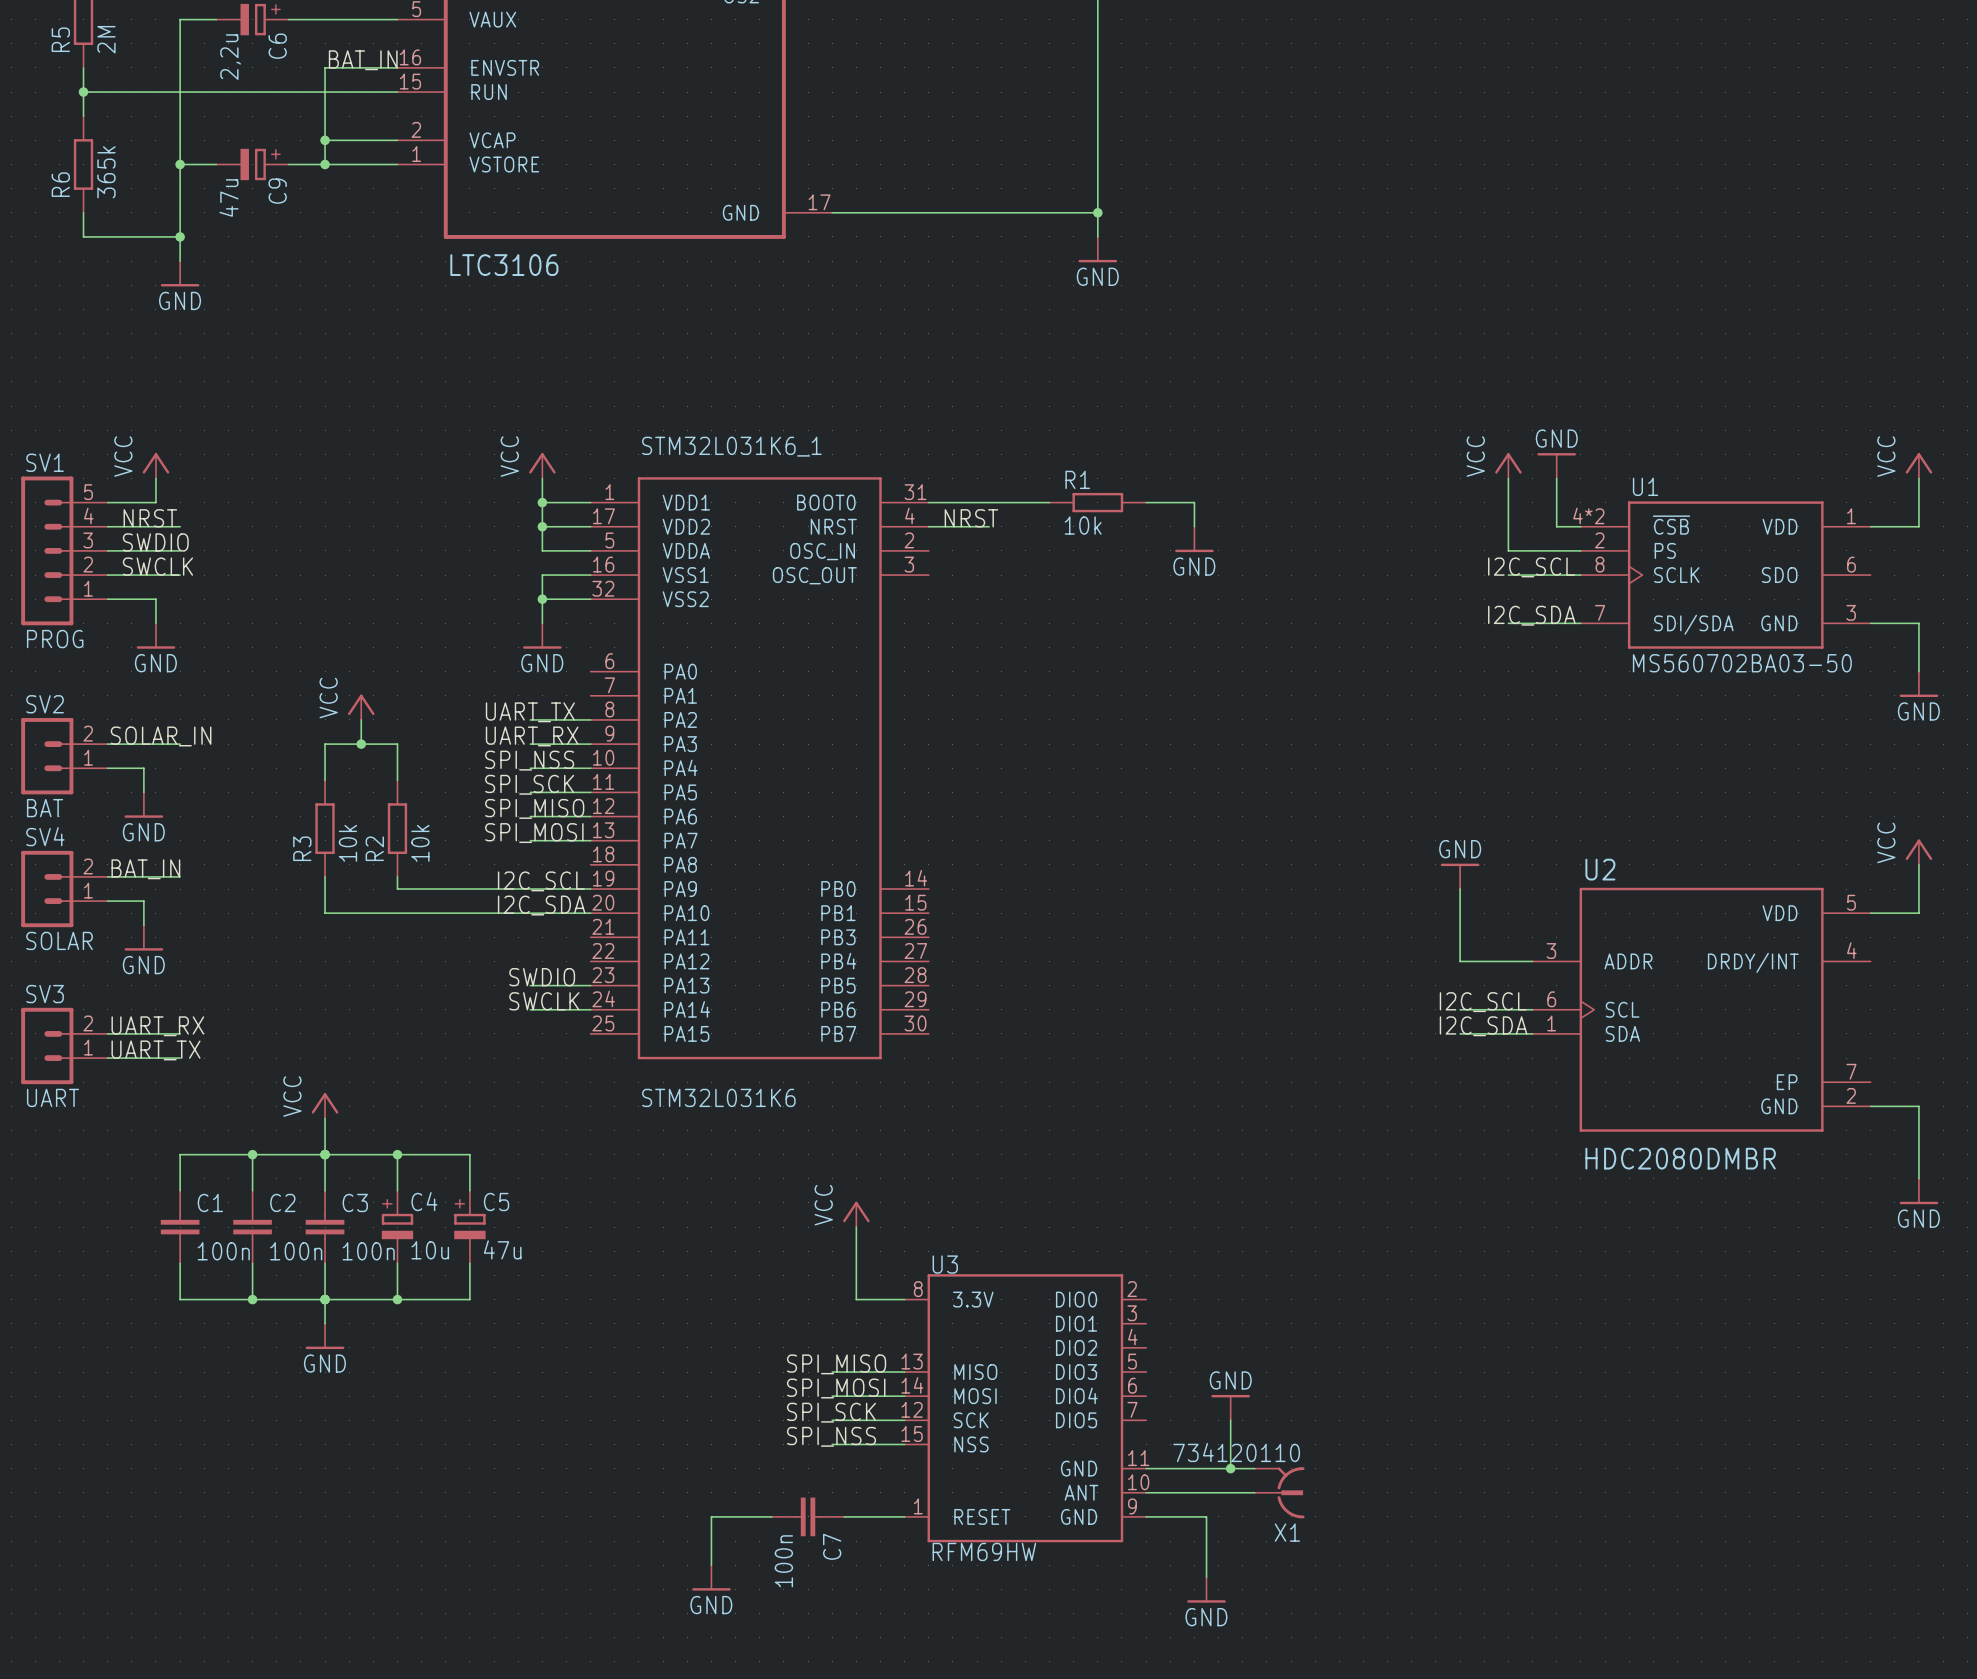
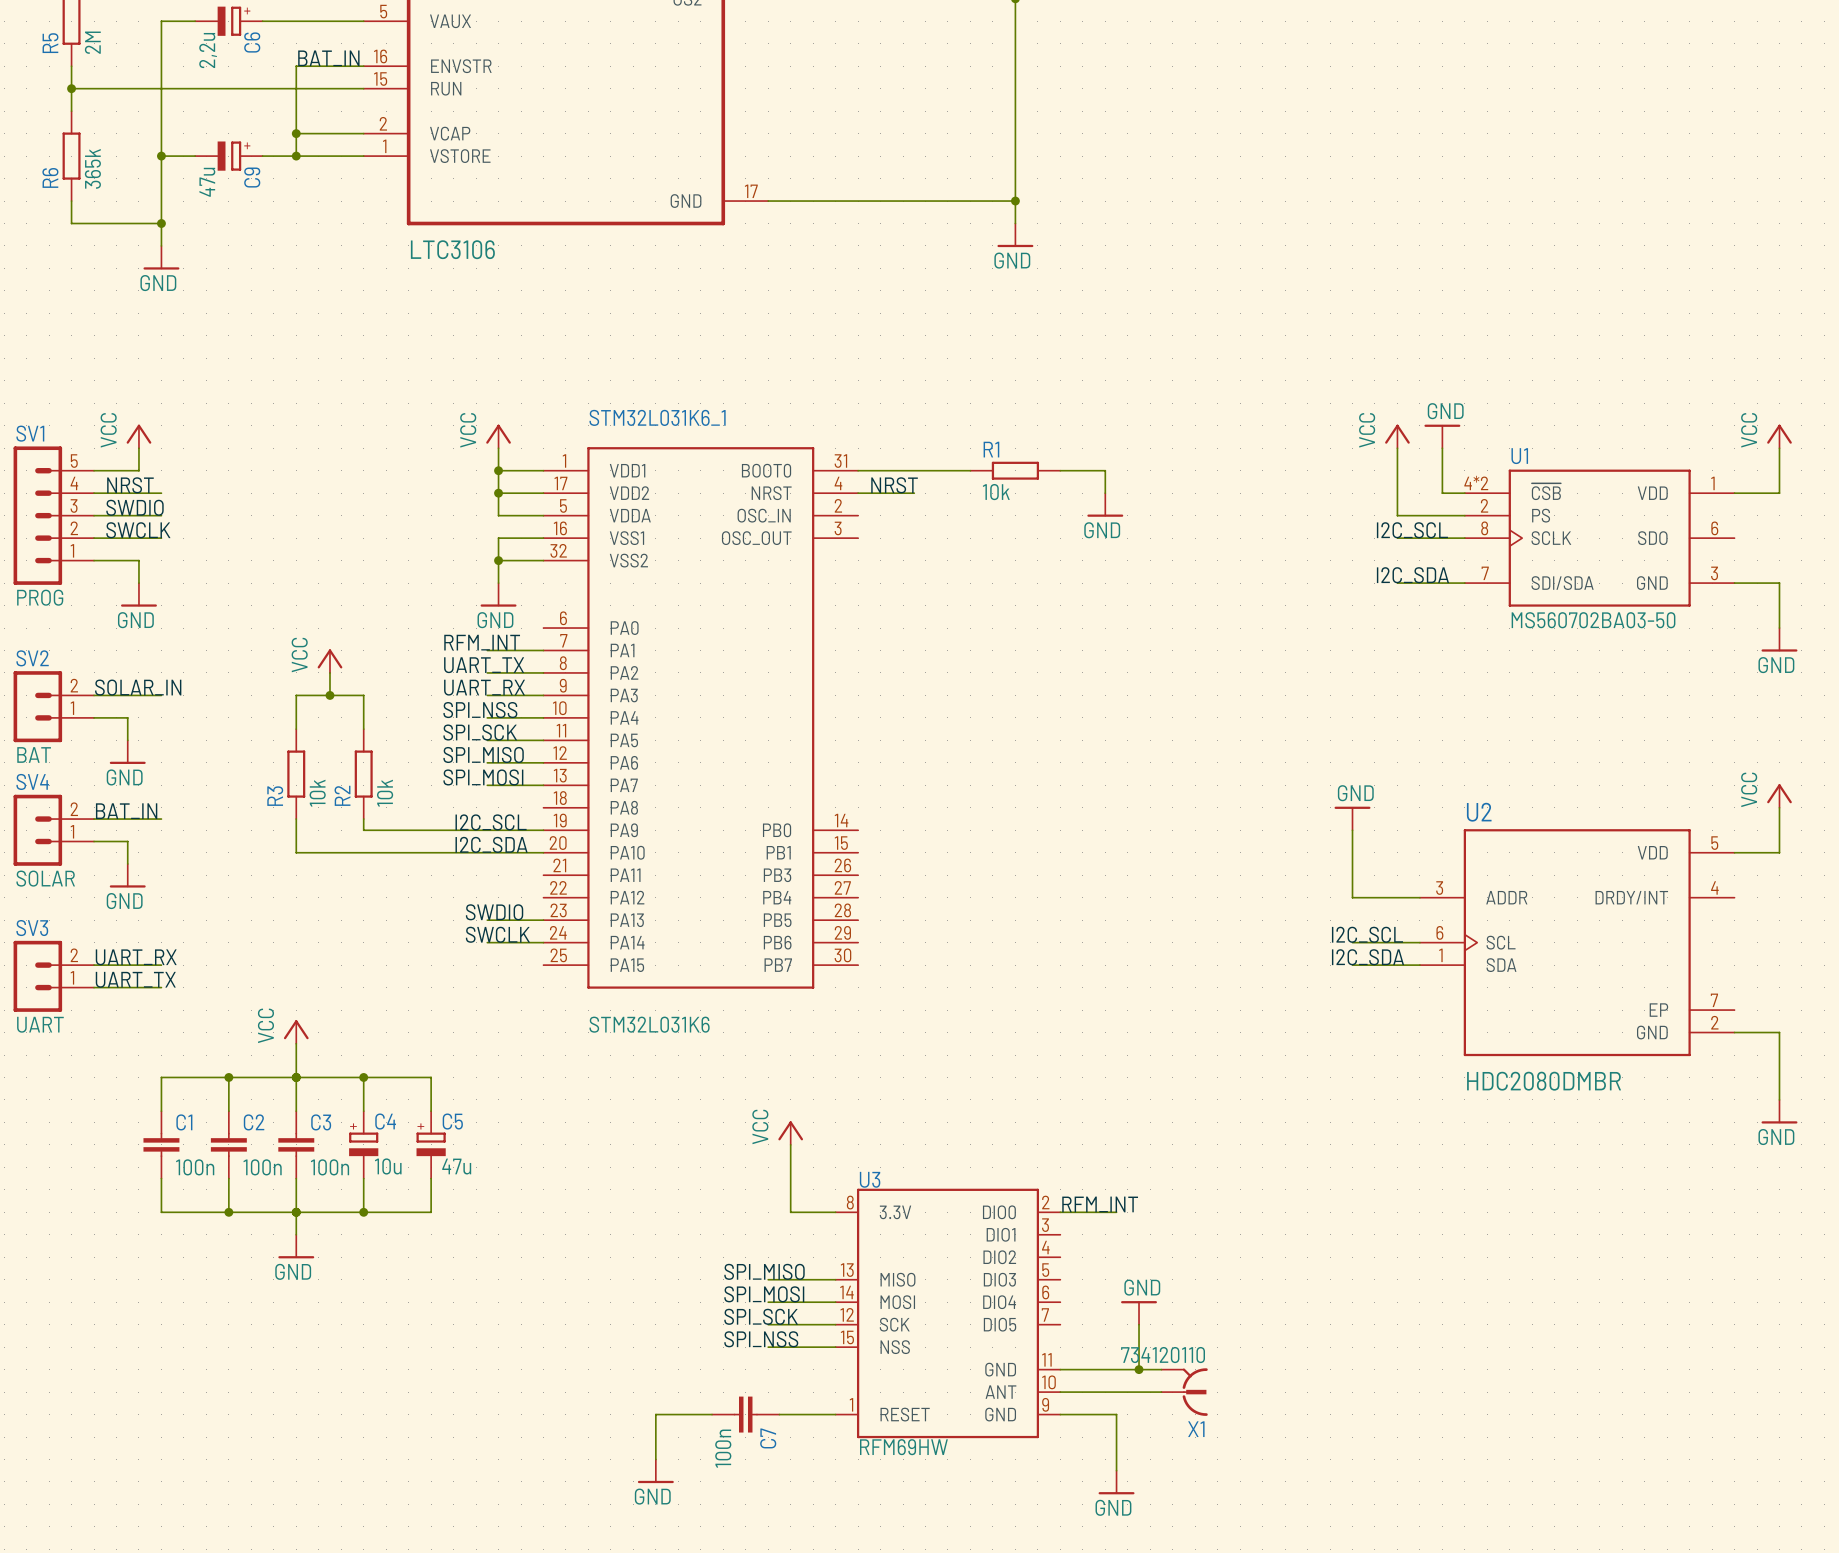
label: none -> RFM_INT (482, 642)
wire: none -> (487, 650) (543, 650)
label: none -> RFM_INT (1100, 1204)
wire: none -> (1060, 1212) (1116, 1212)

